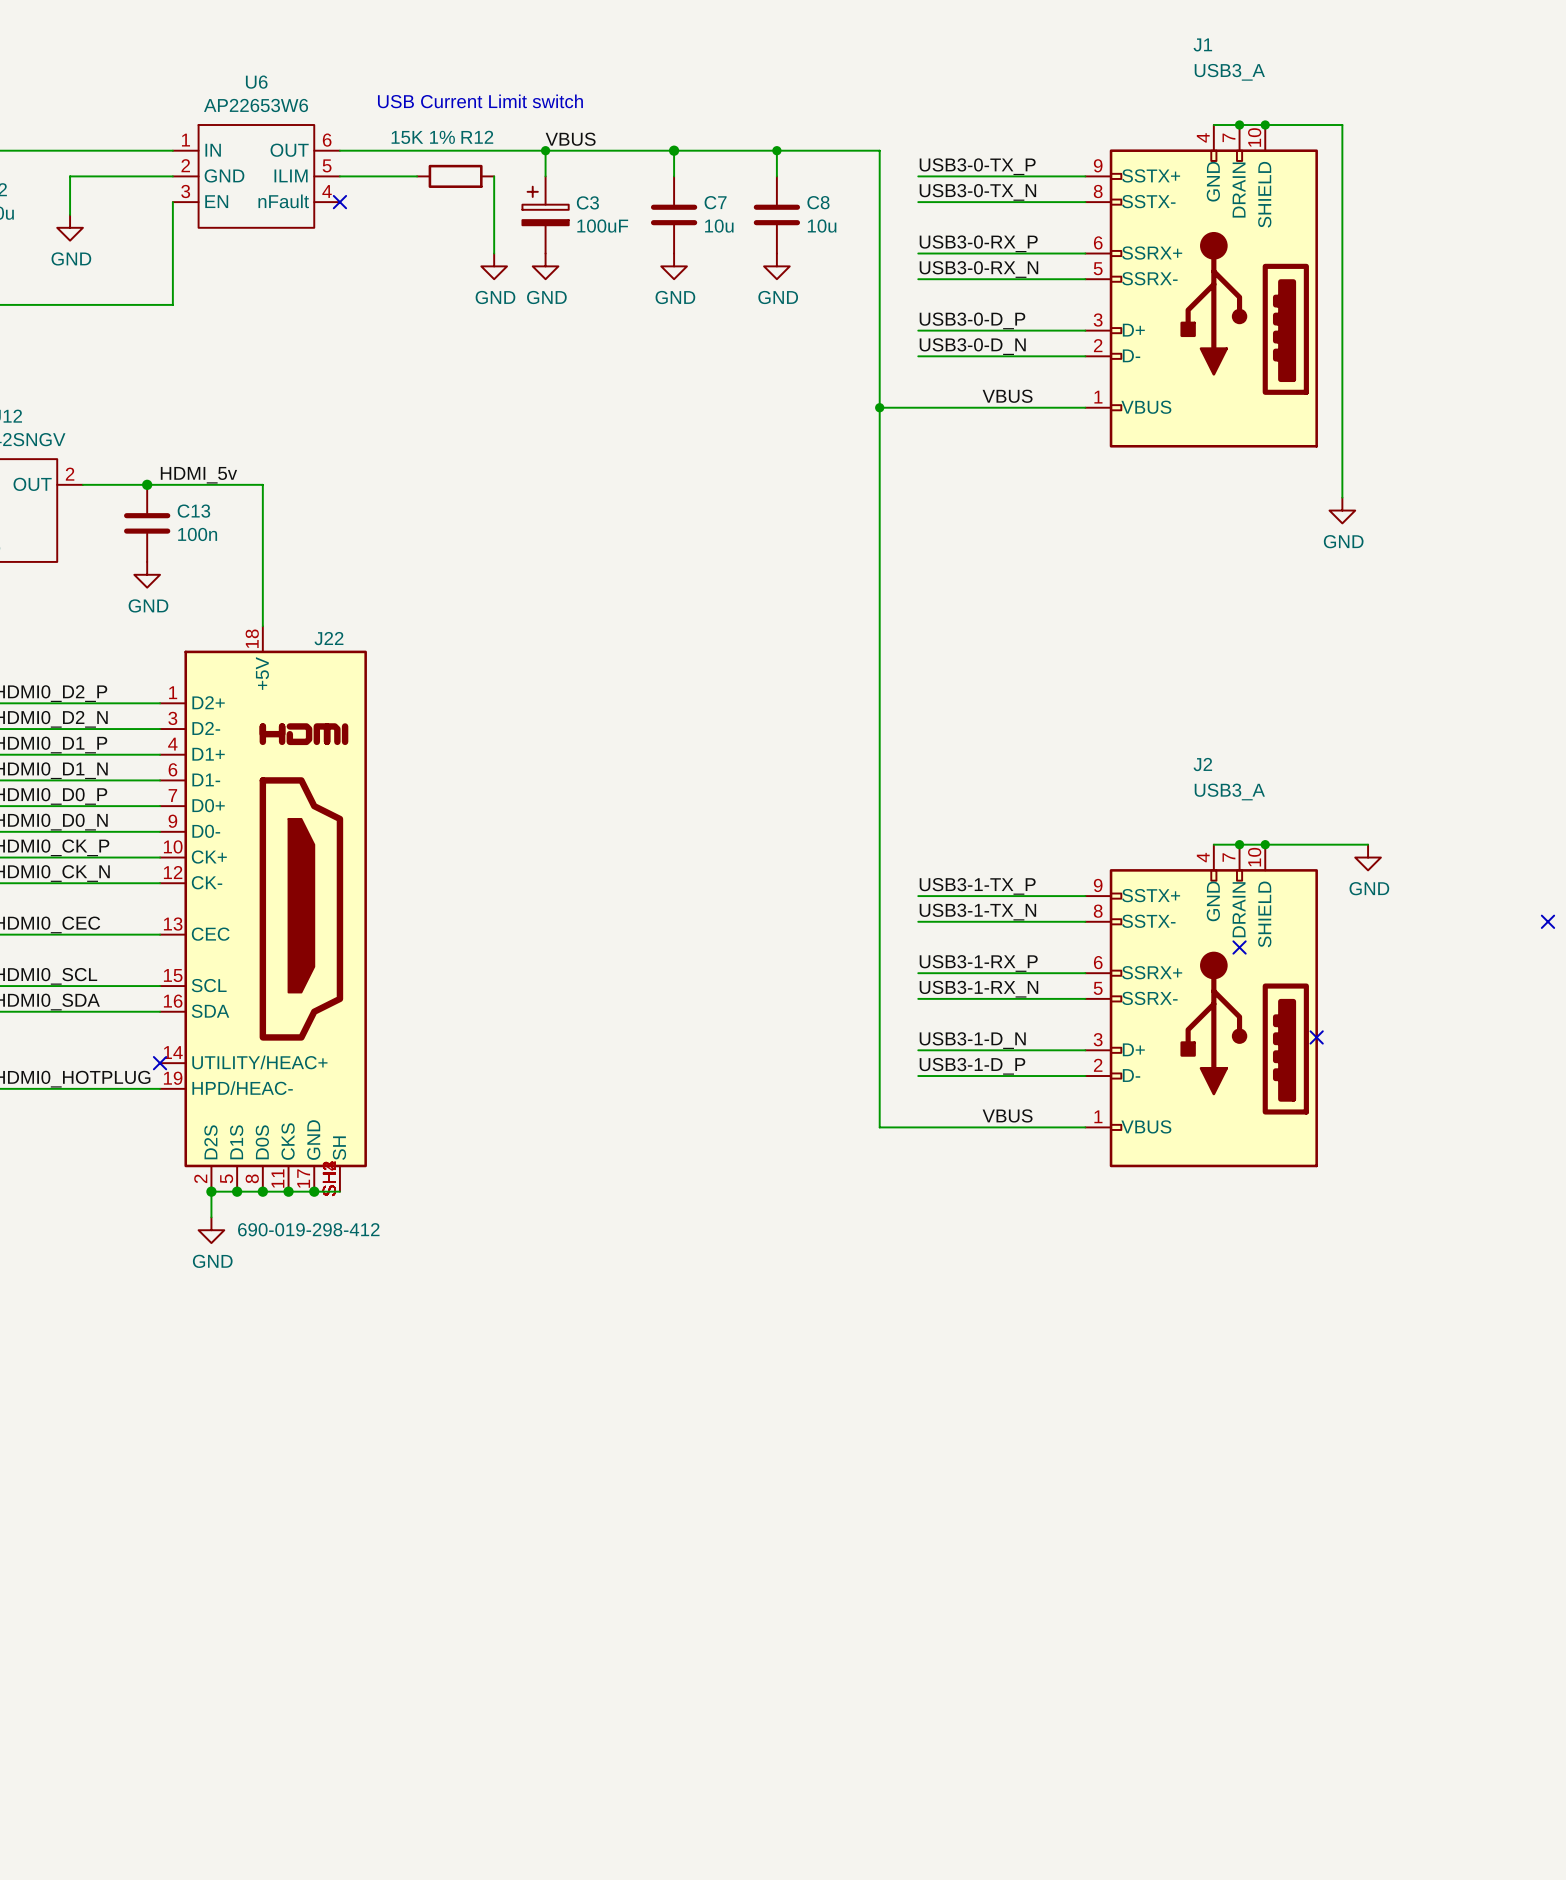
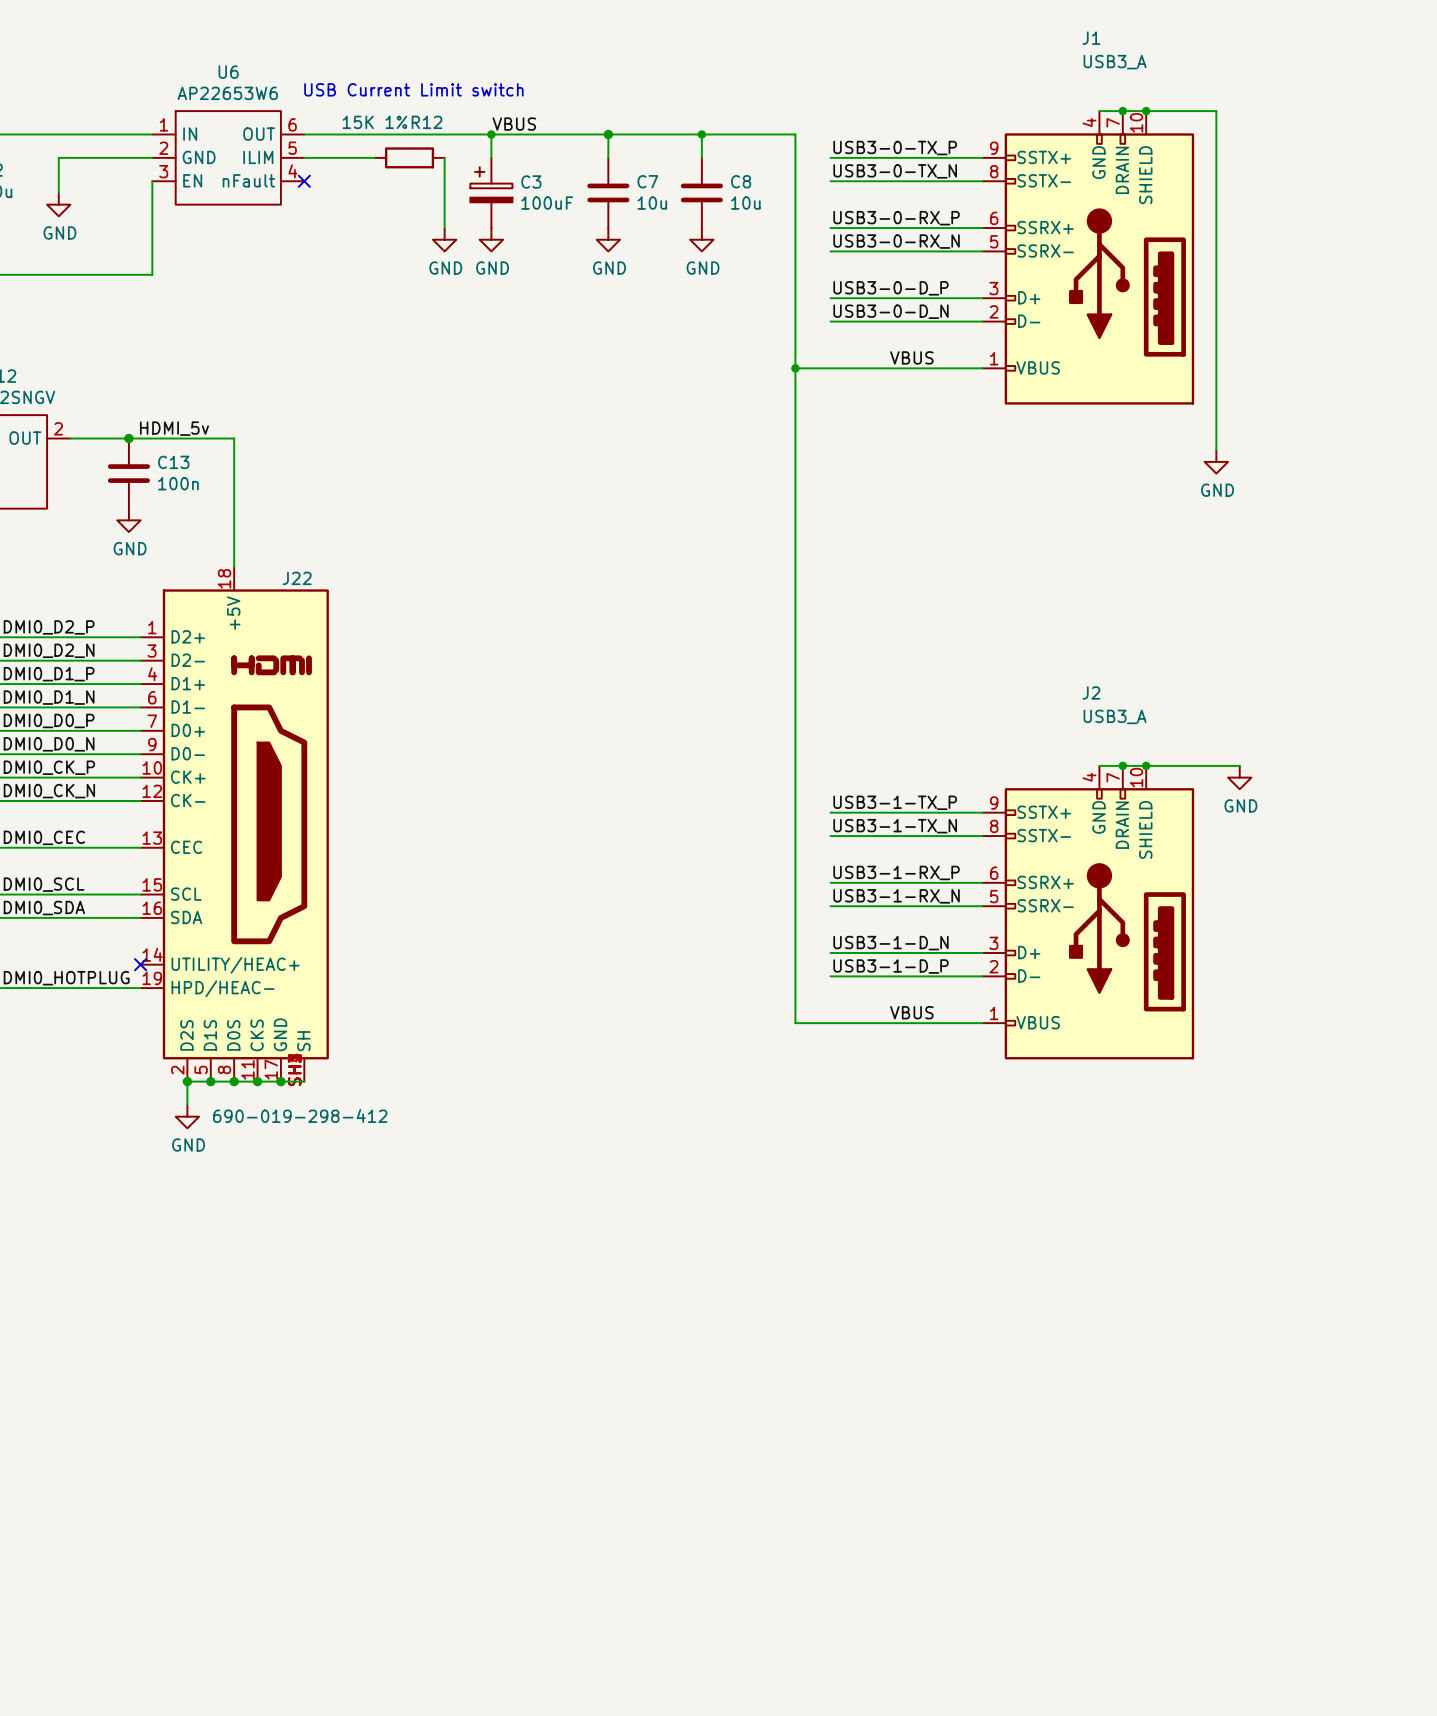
no-connect mark: (1547, 921) -> none
no-connect mark: (1239, 947) -> none
no-connect mark: (1316, 1037) -> none

